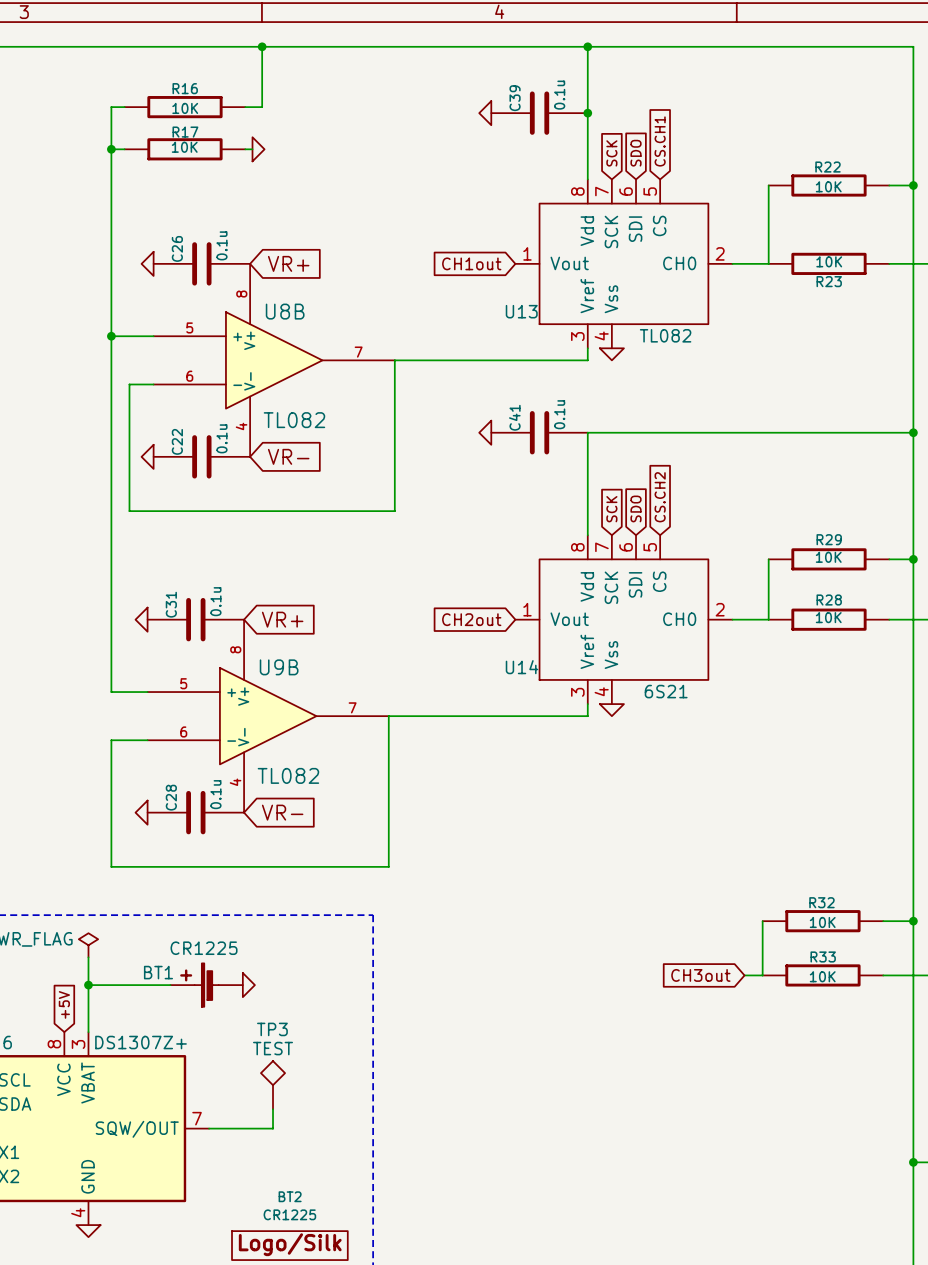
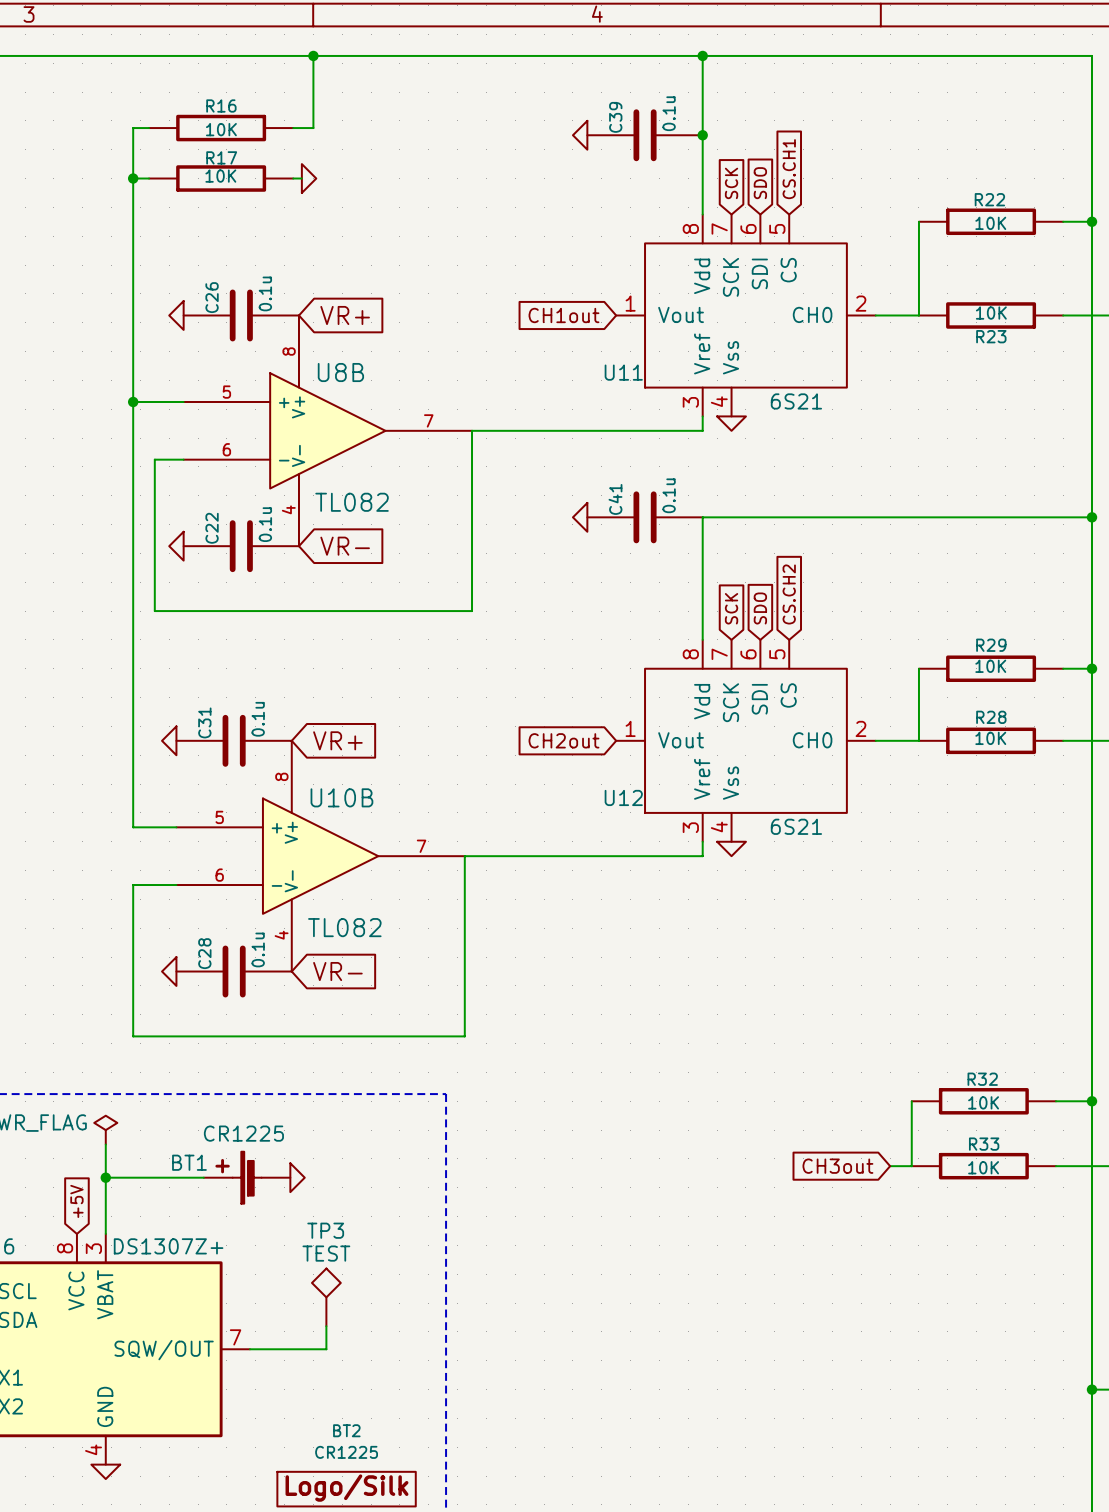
U13 name: U13 (521, 311) -> U11 (623, 372)
U13 value: TL082 (665, 335) -> 6S21 (796, 401)
U9B name: U9B (279, 667) -> U10B (341, 797)
U14 name: U14 (522, 667) -> U12 (623, 797)

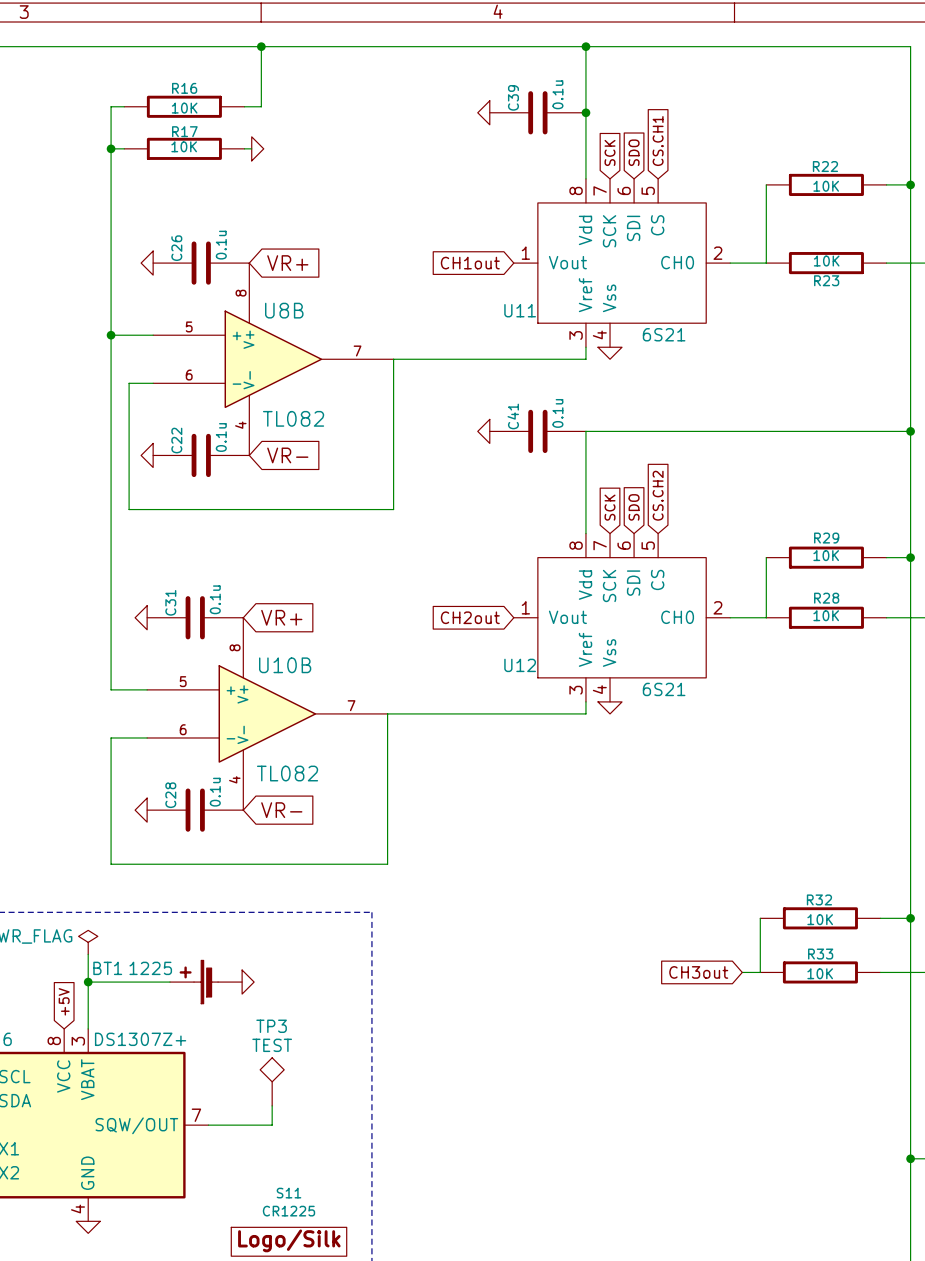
BT1 value: CR1225 (243, 1133) -> 1225 (150, 968)
BT1 name position: BT1 (189, 1162) -> BT1 (107, 968)
BT2 name: BT2 (346, 1430) -> S11 (289, 1193)

